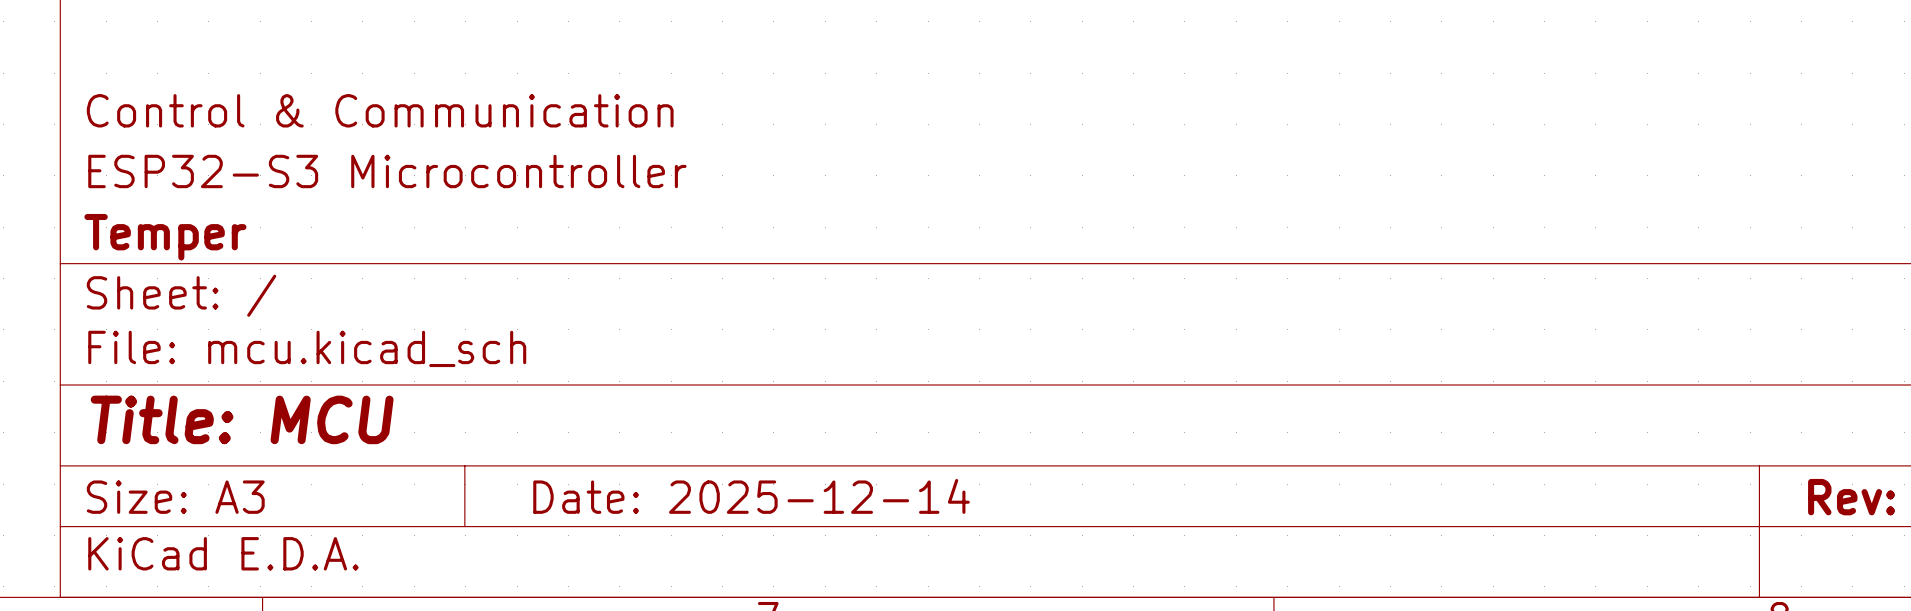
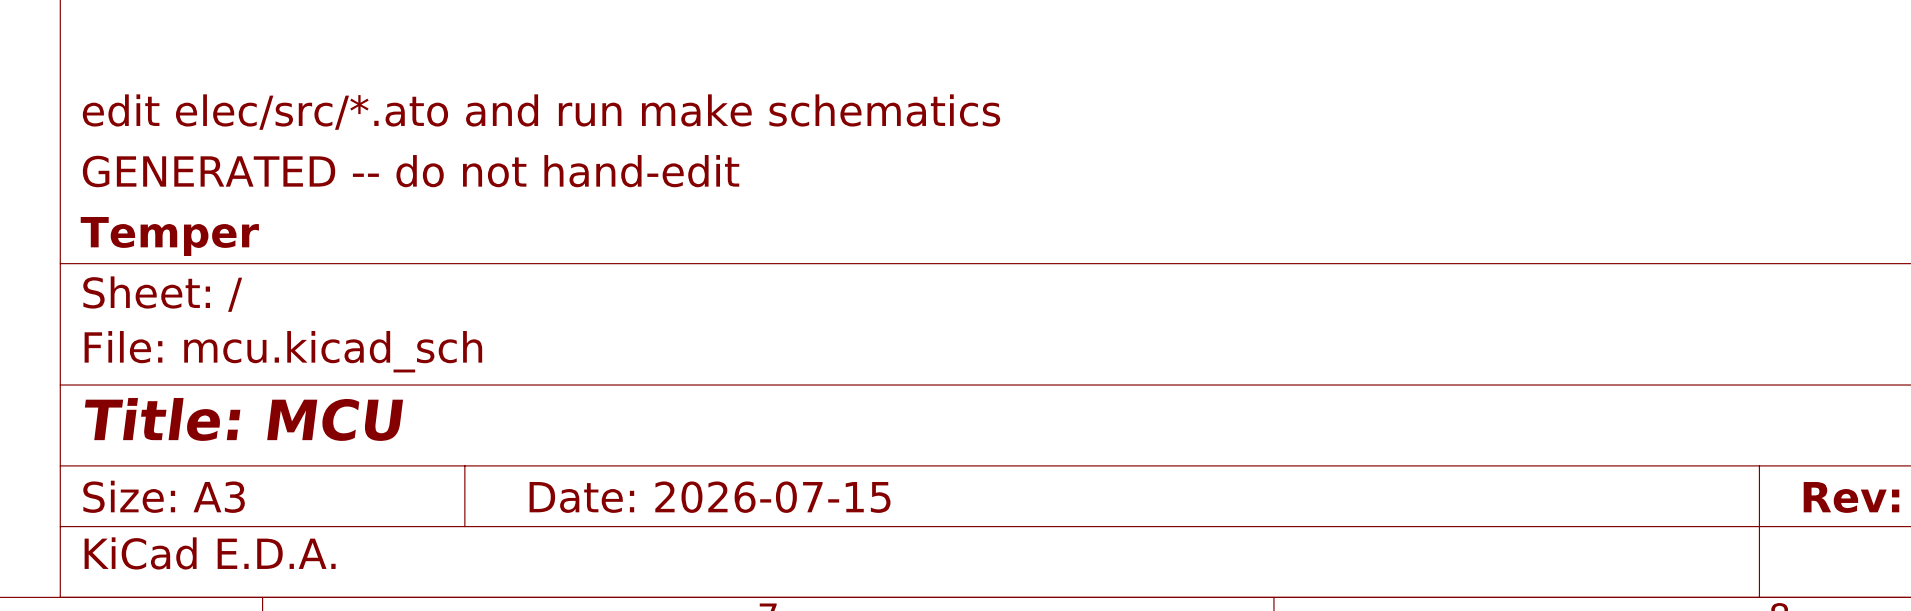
title block: Control & Communication (380, 110) -> edit elec/src/*.ato and run make schematics (541, 112)
title block: ESP32-S3 Microcontroller (387, 171) -> GENERATED -- do not hand-edit (411, 171)
title block: Date: 2025-12-14 (751, 496) -> Date: 2026-07-15 (710, 497)

